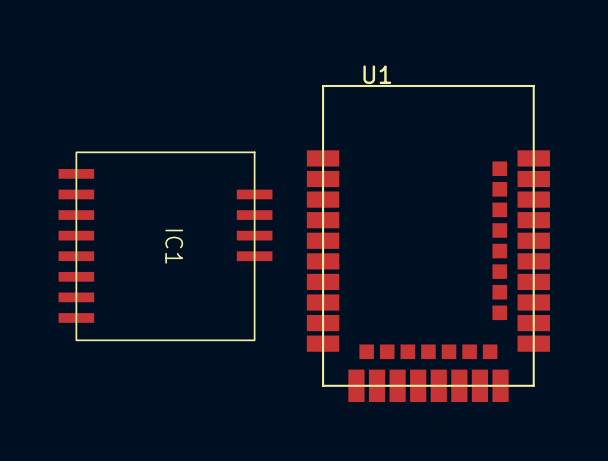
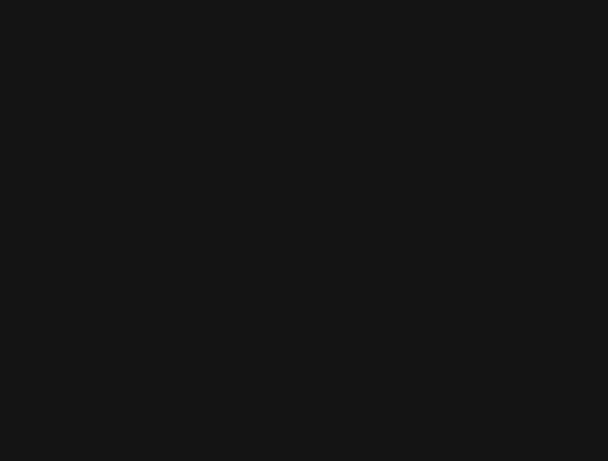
U1: (428, 243) -> none
IC1: (165, 246) -> none

